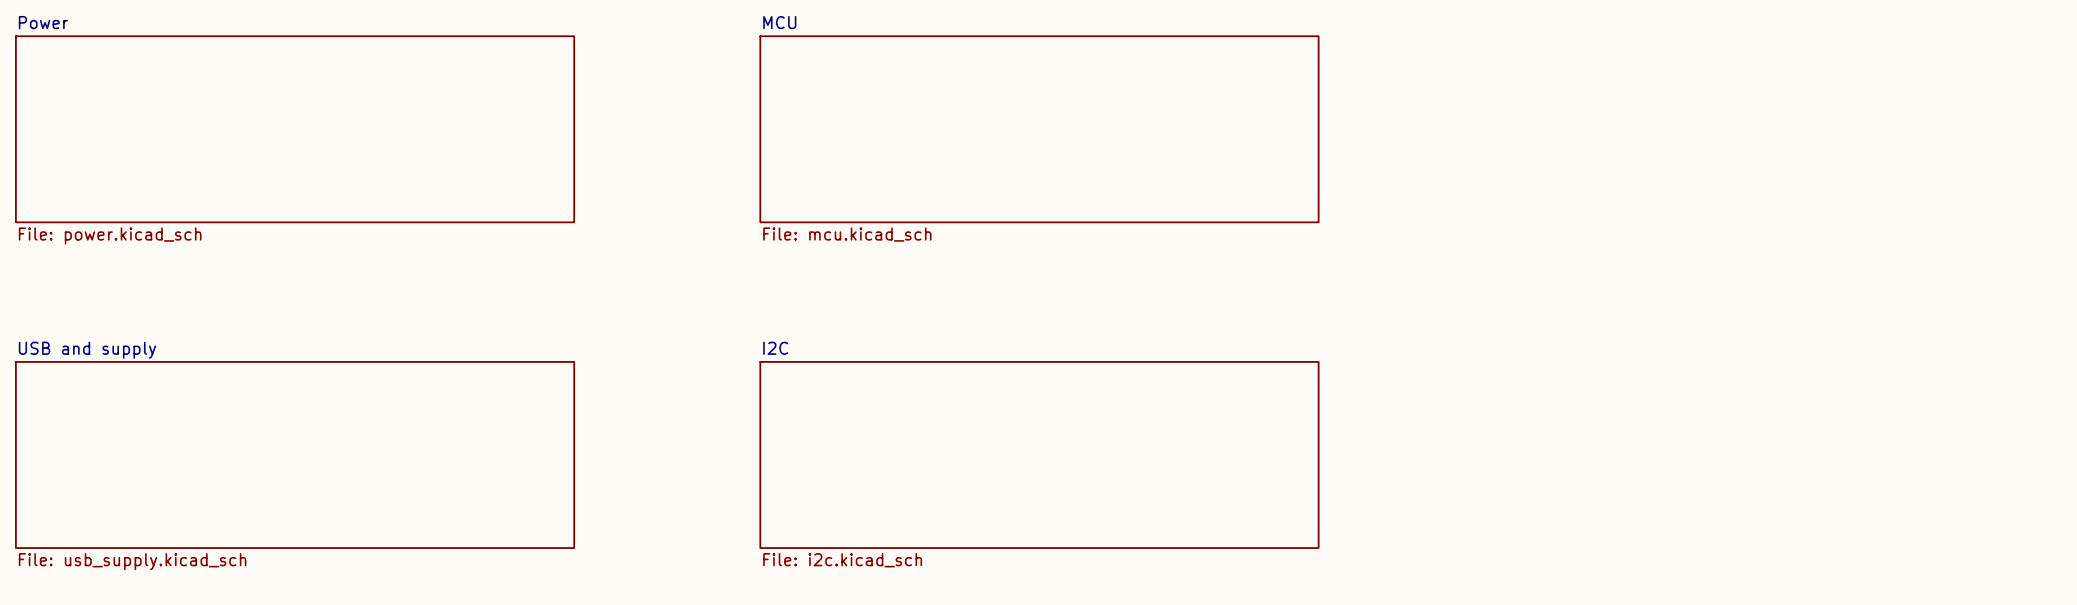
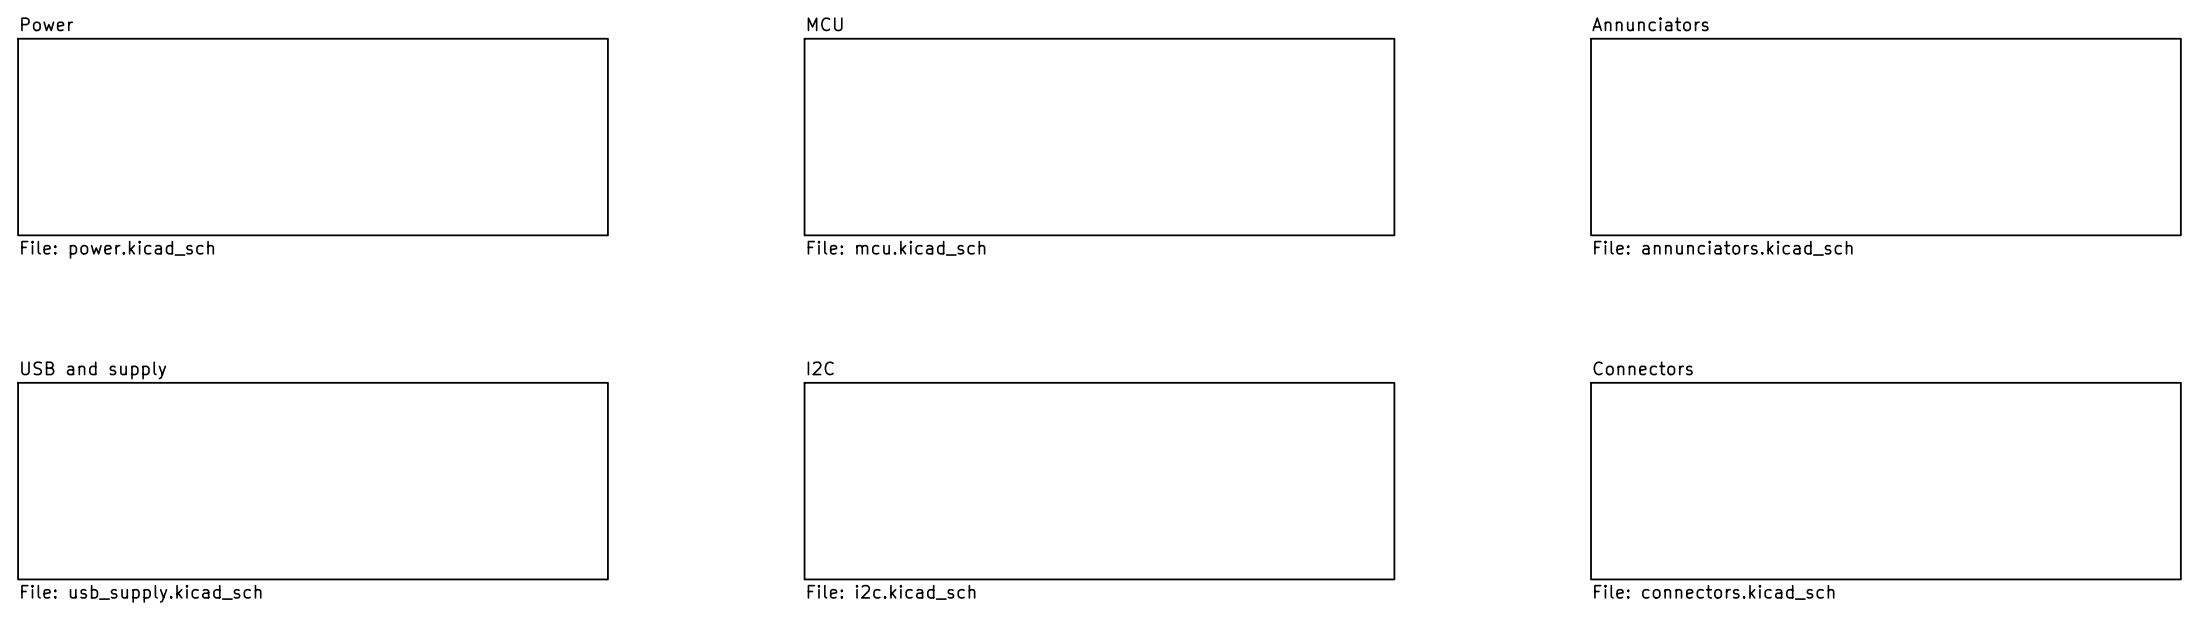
sheet Annunciators: none -> File: annunciators.kicad_sch (1885, 137)
sheet Connectors: none -> File: connectors.kicad_sch (1885, 481)

